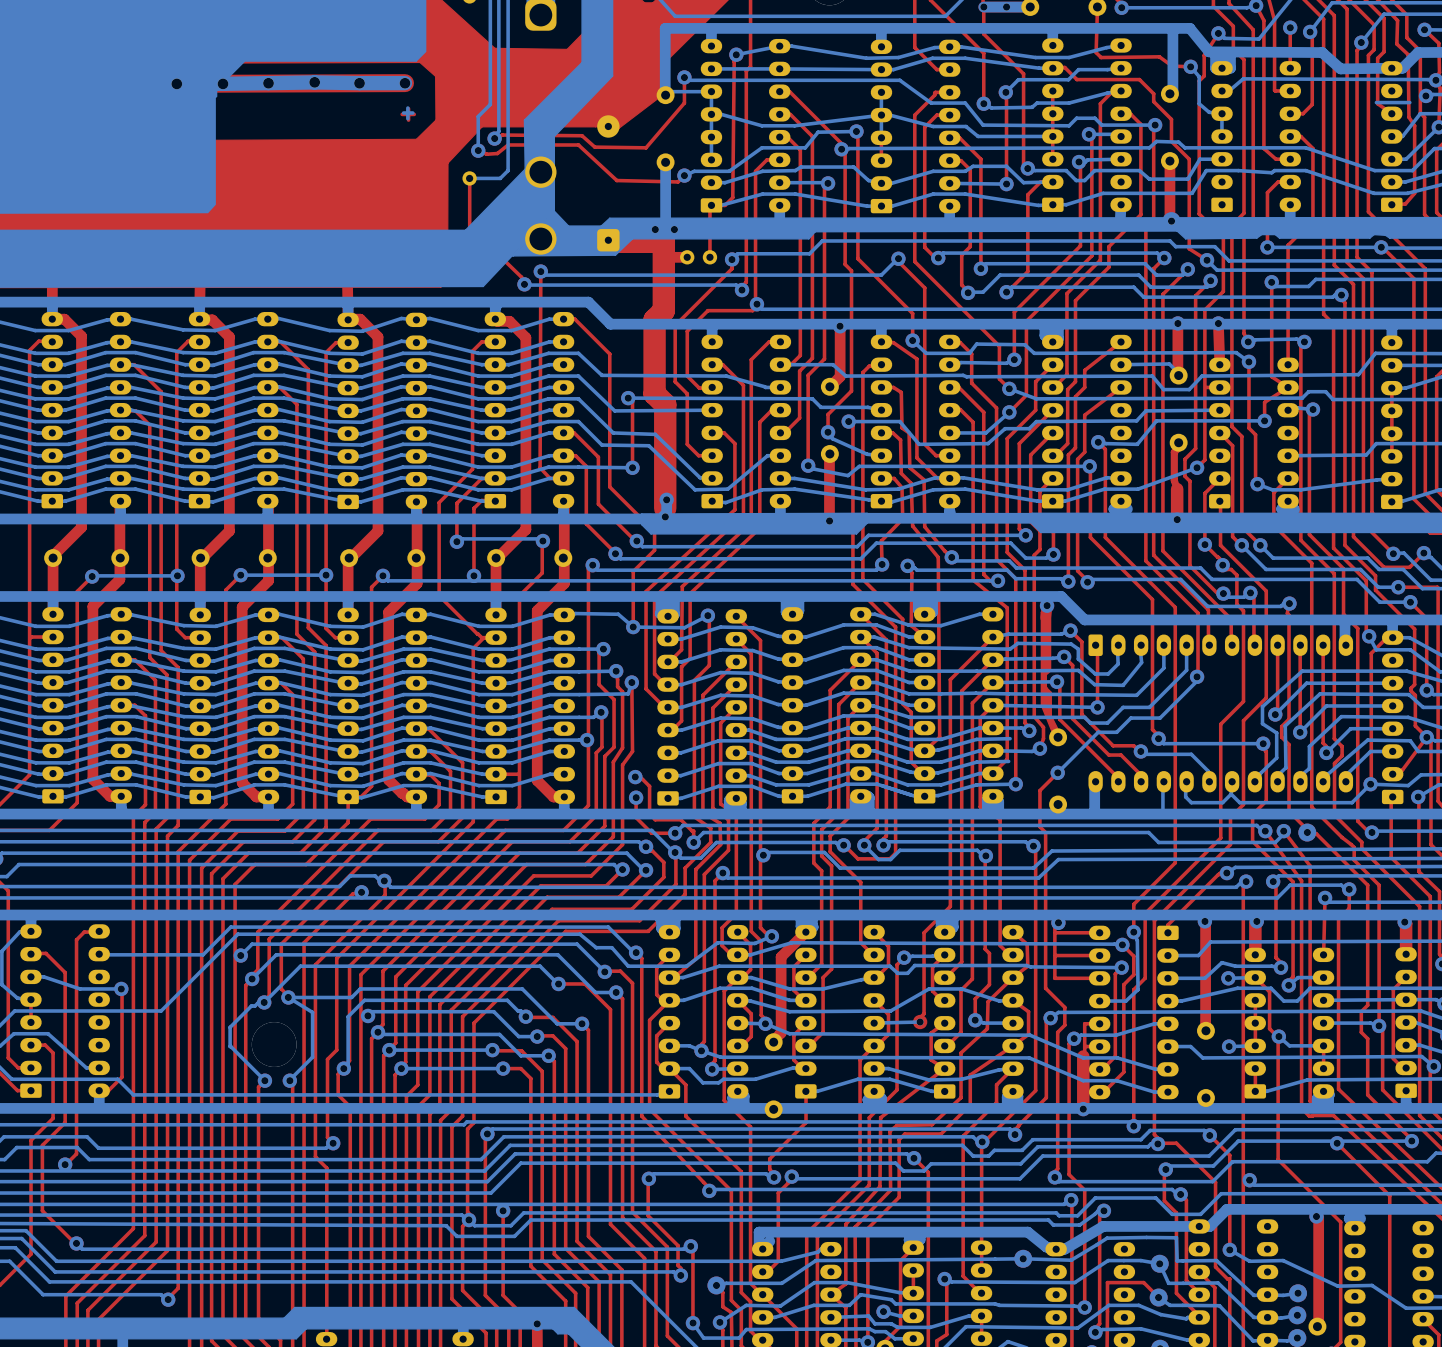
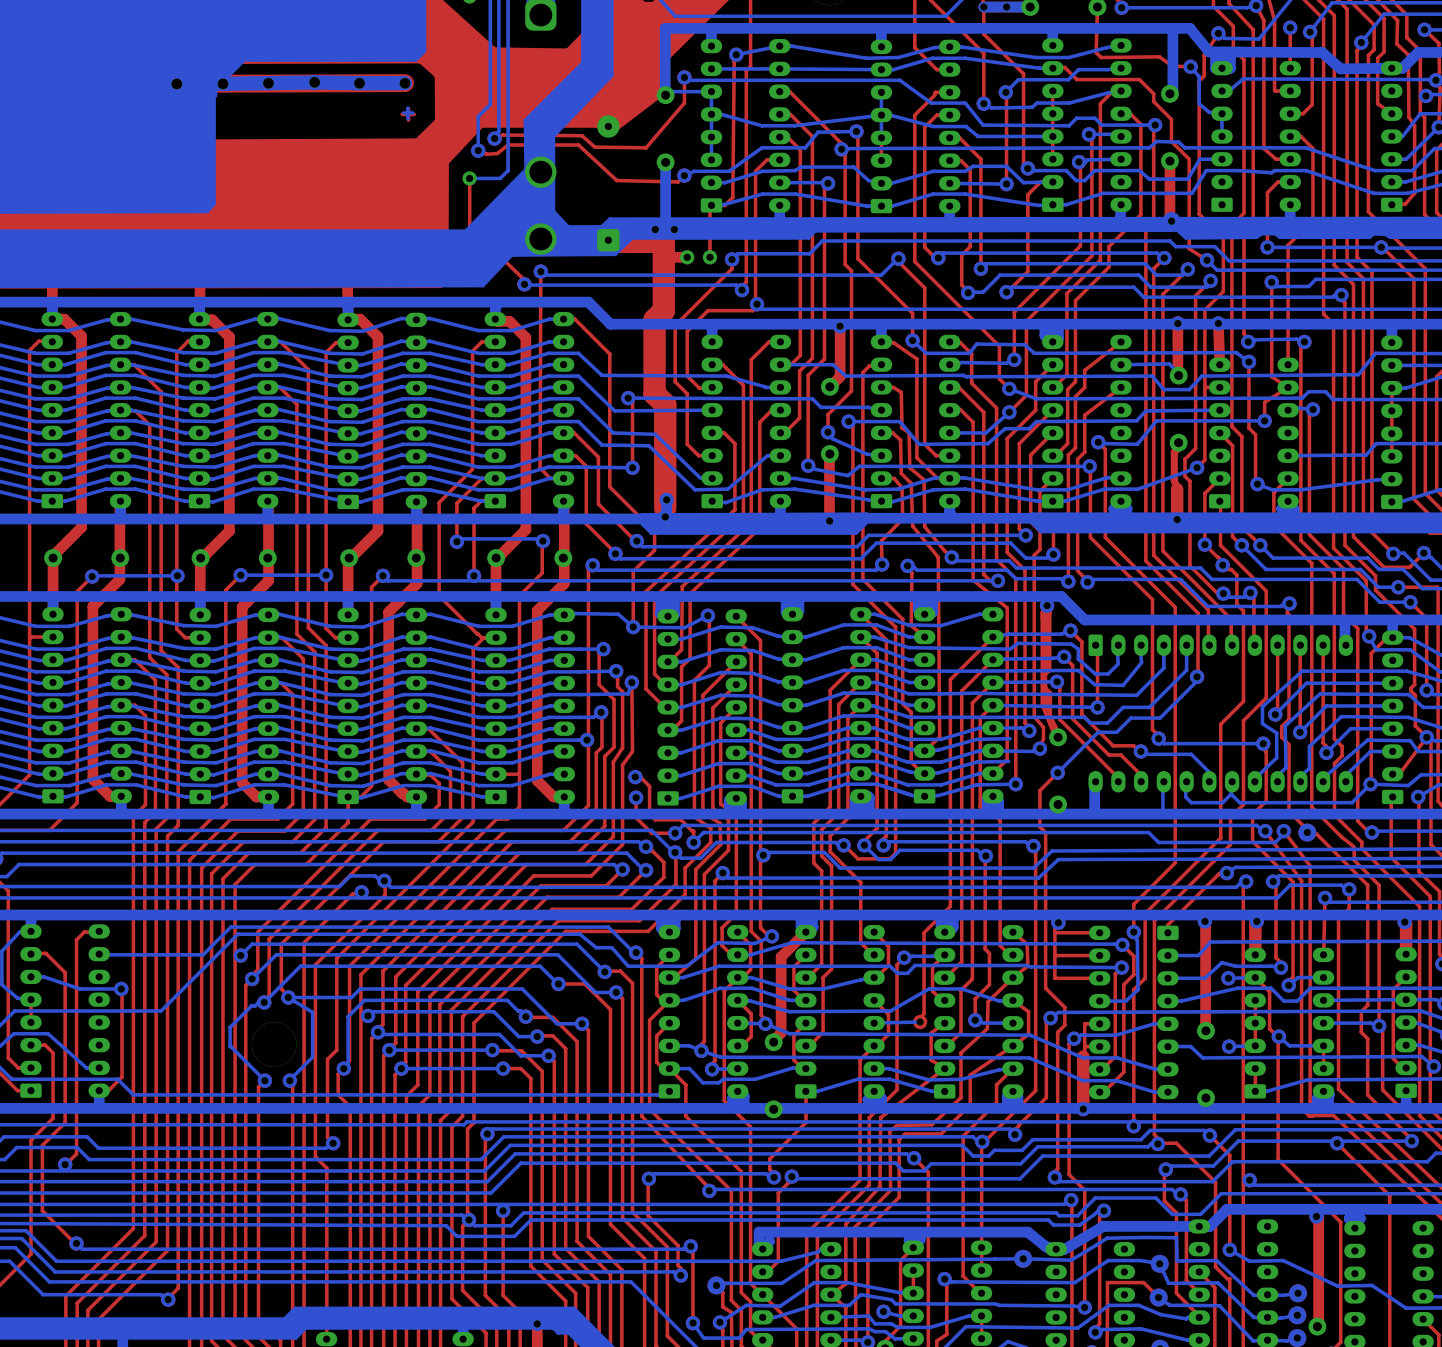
bottom track: (1409, 102) (1376, 102) -> none

